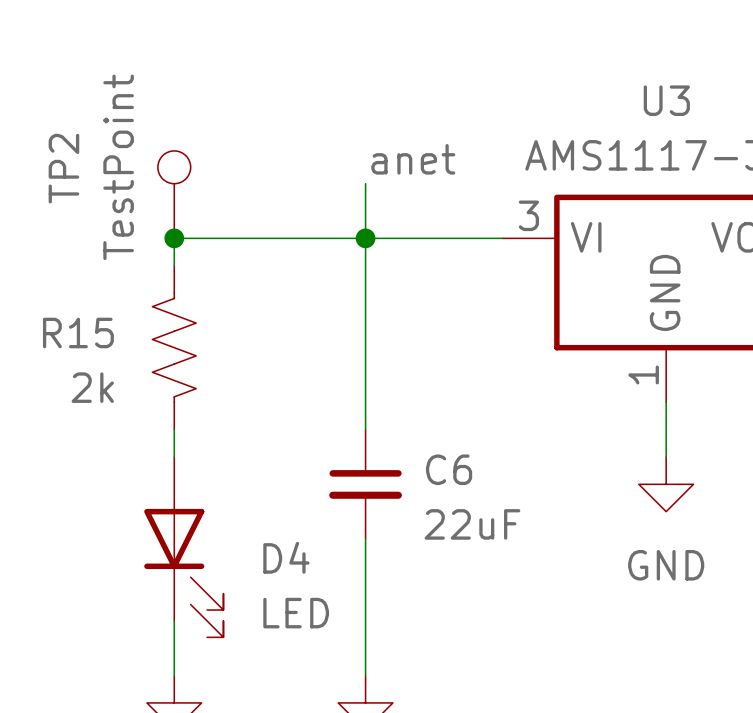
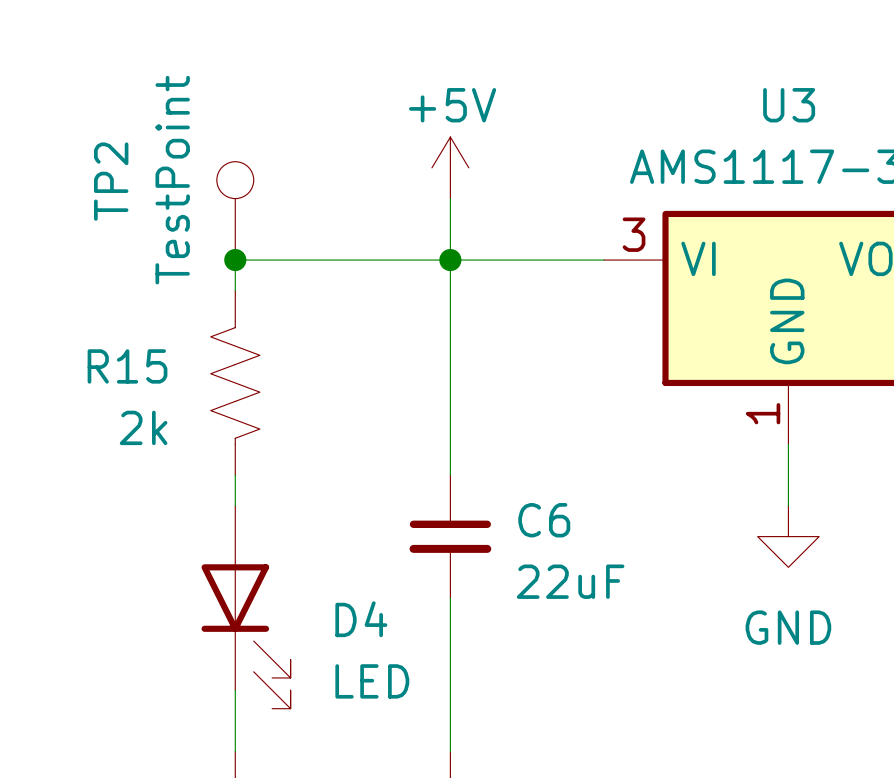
power symbol: none -> +5V (450, 167)
label: anet (413, 159) -> none

